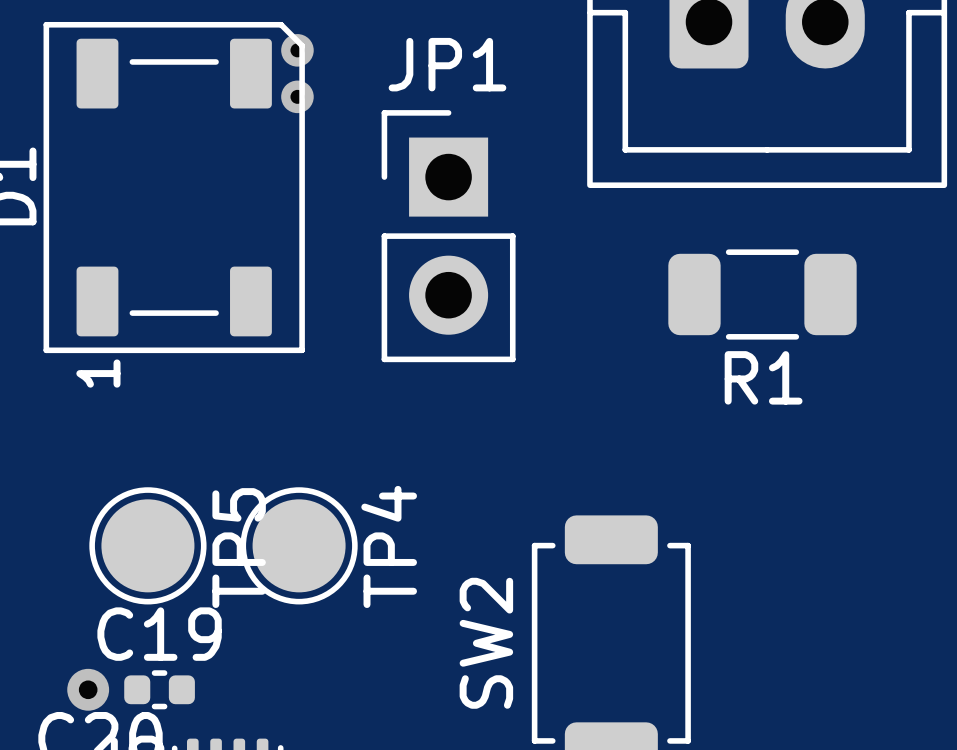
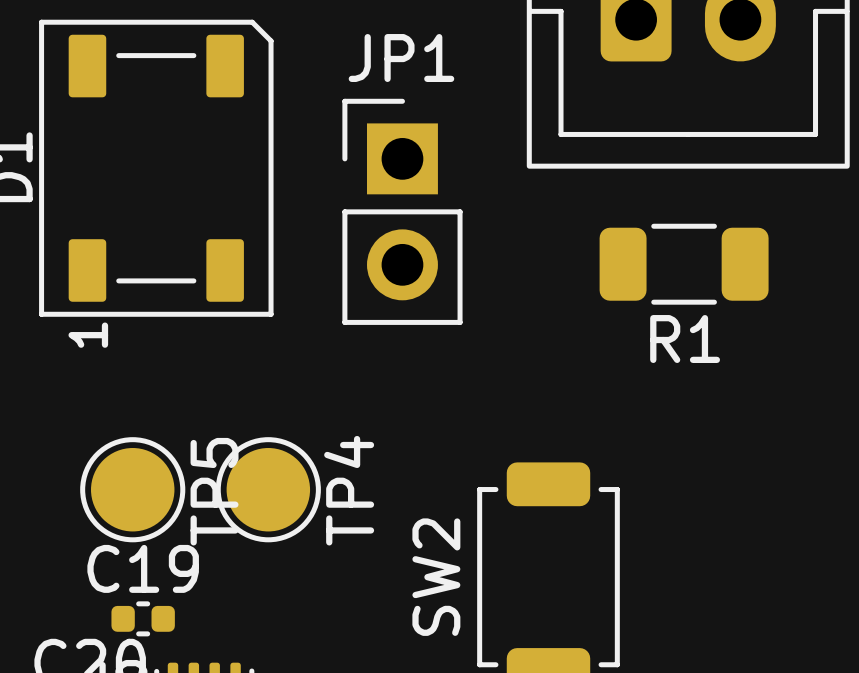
via: (297, 50) -> none
via: (297, 96) -> none
via: (88, 689) -> none

